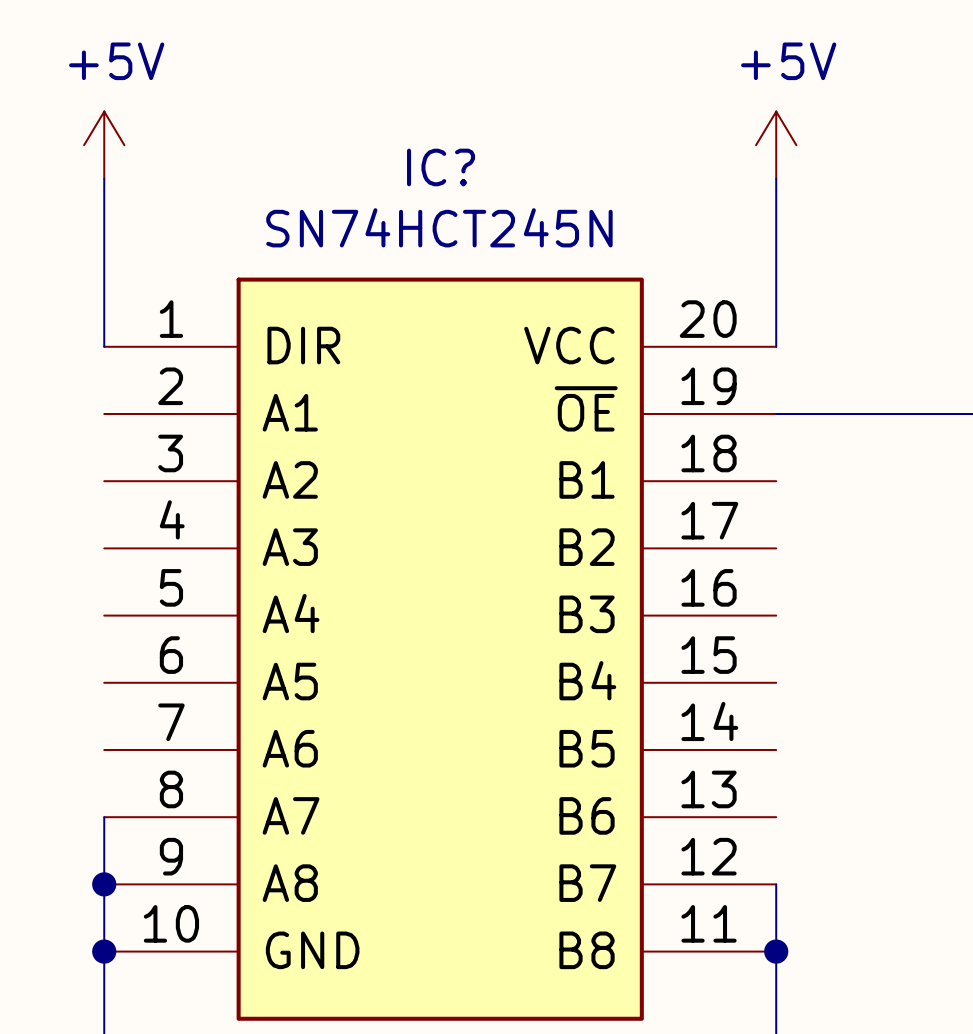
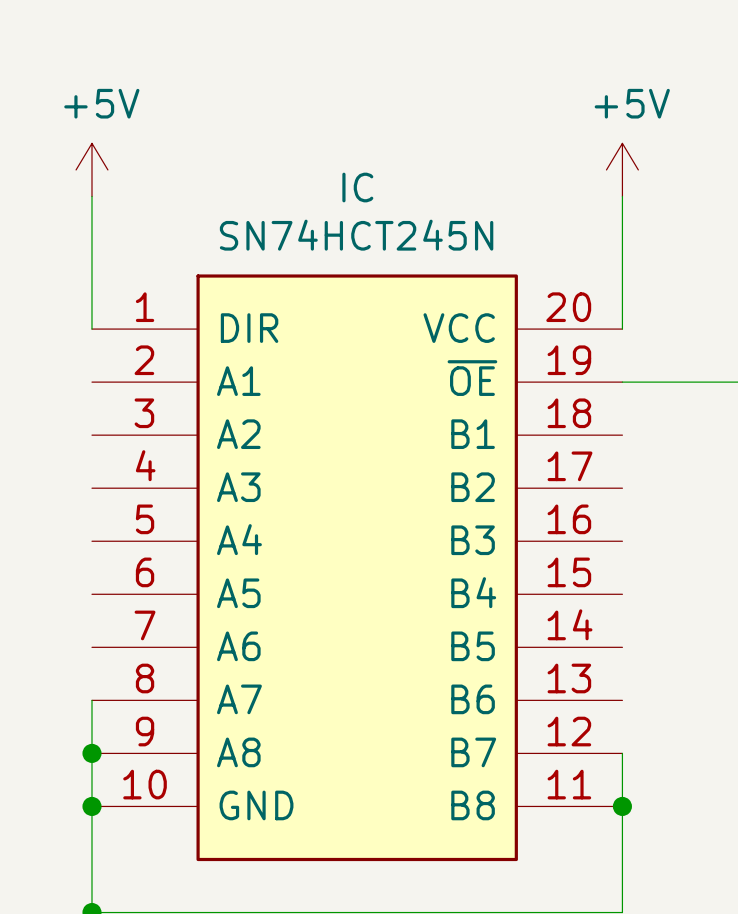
IC? name: IC? (441, 167) -> IC (357, 187)

